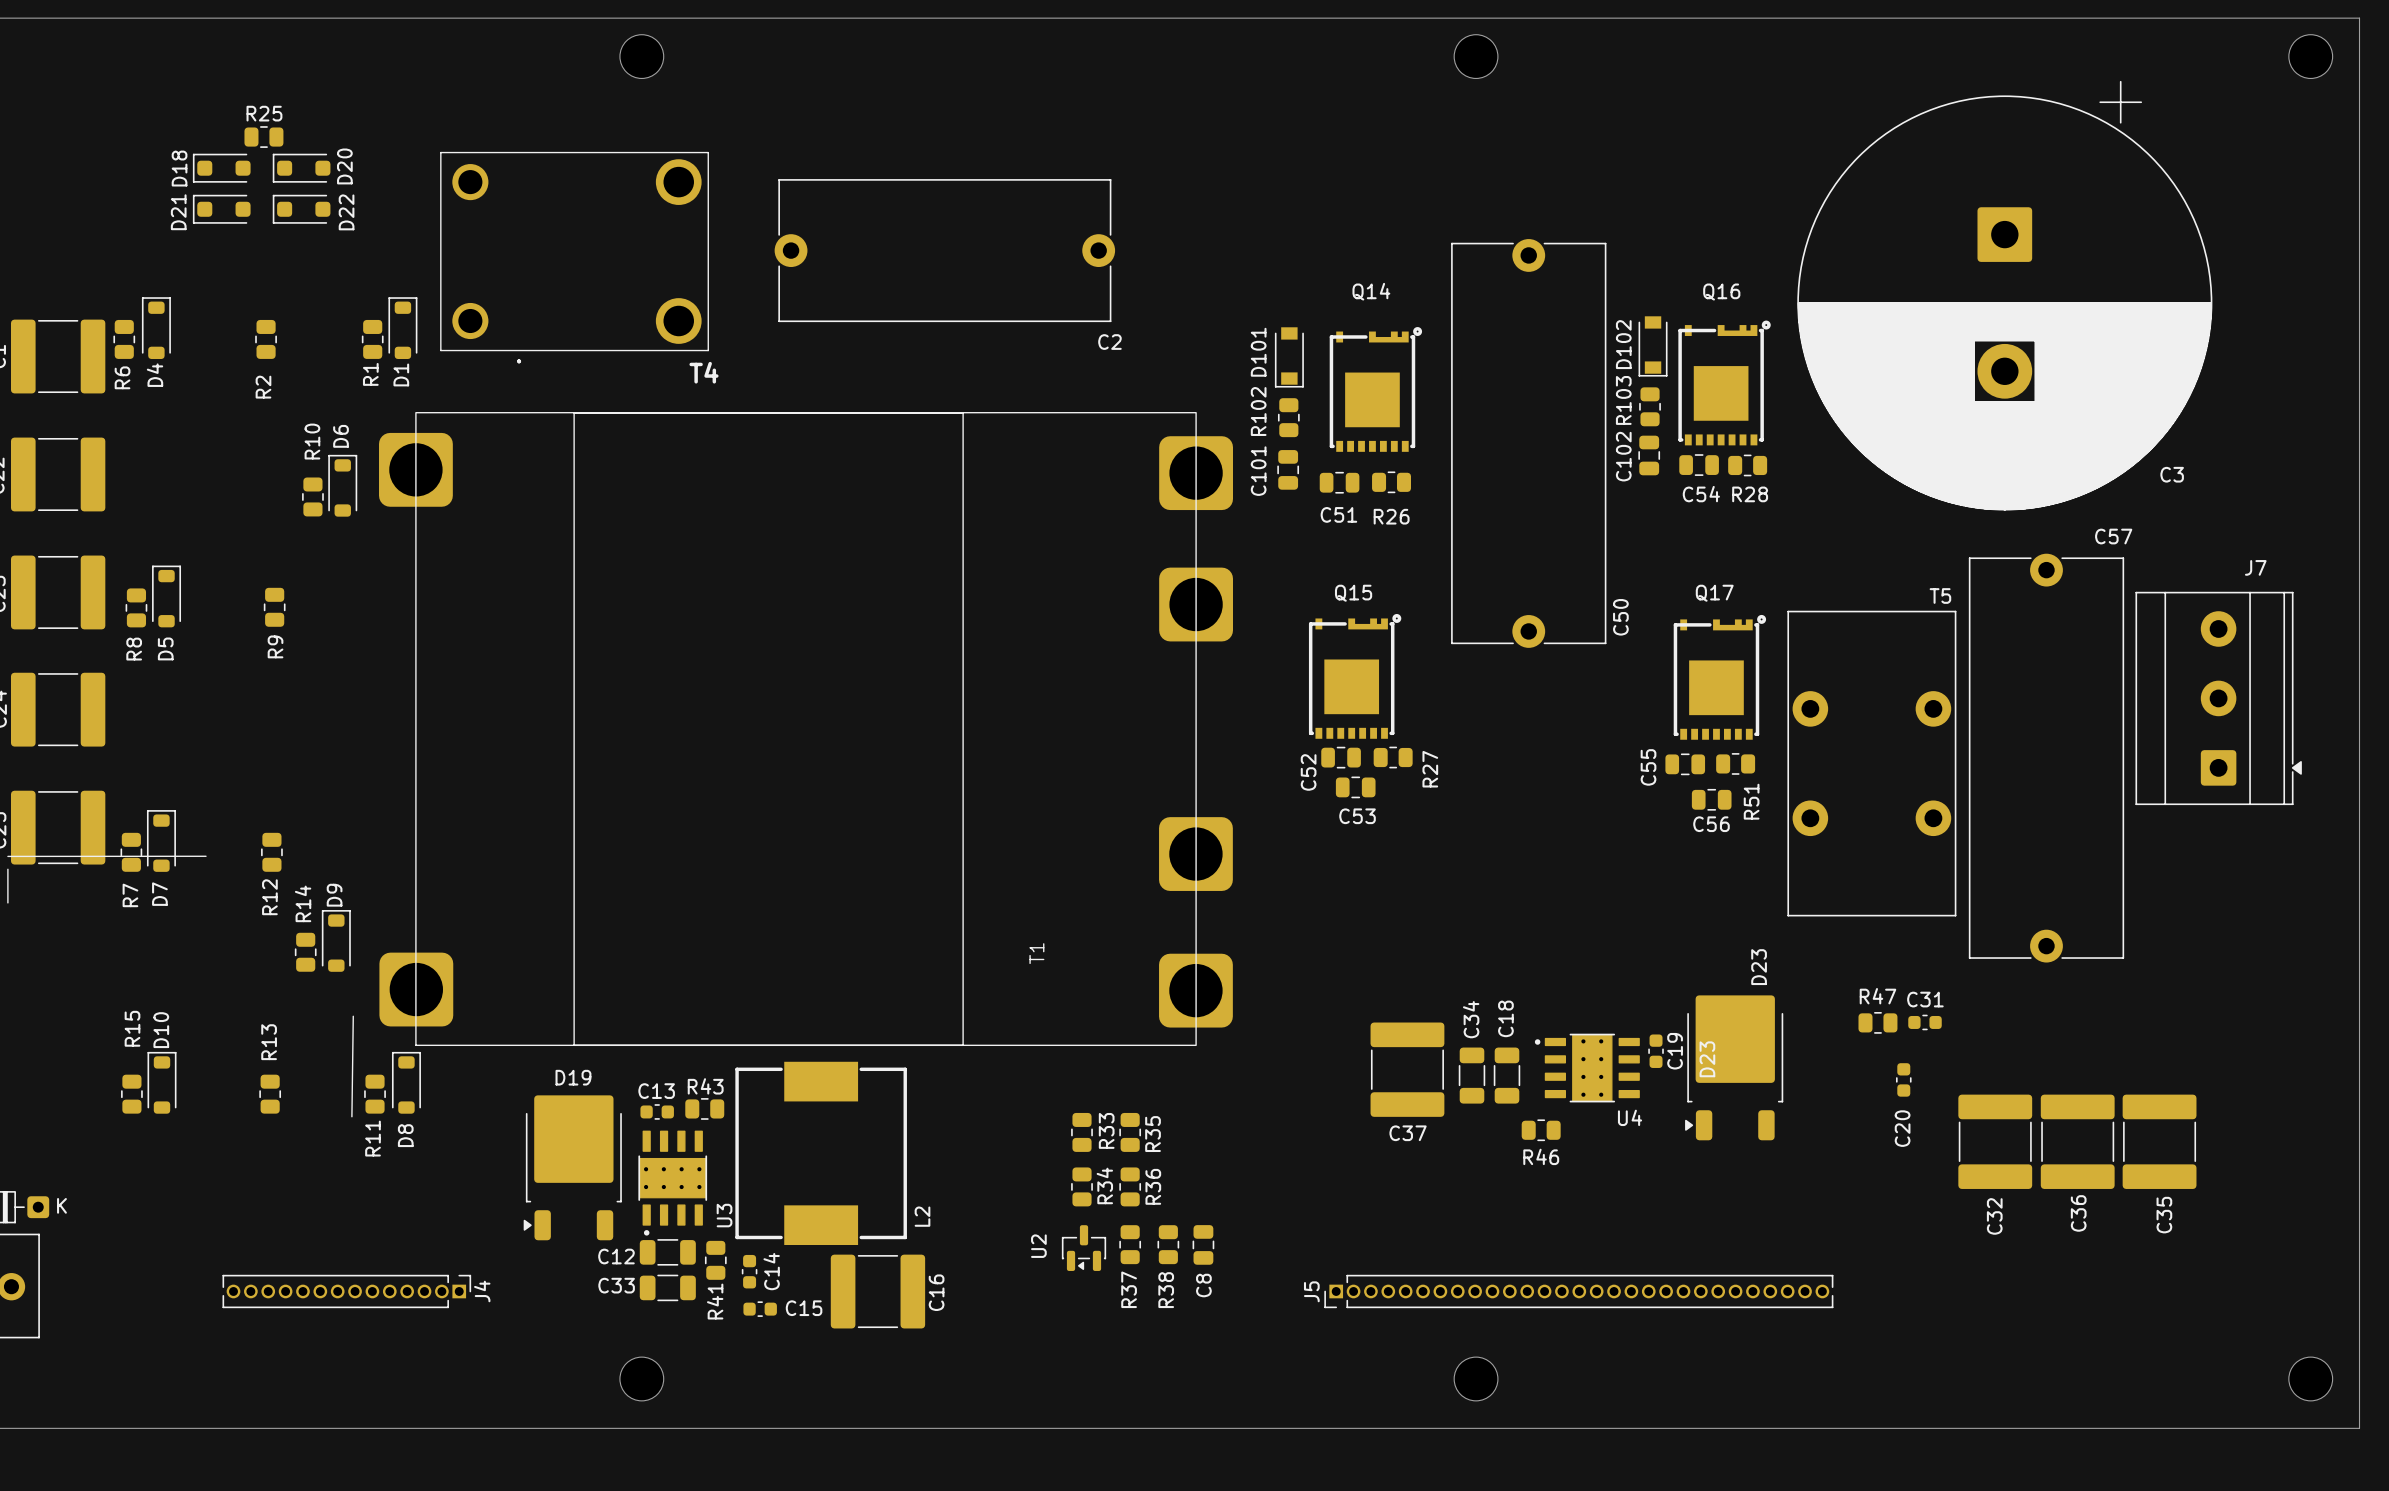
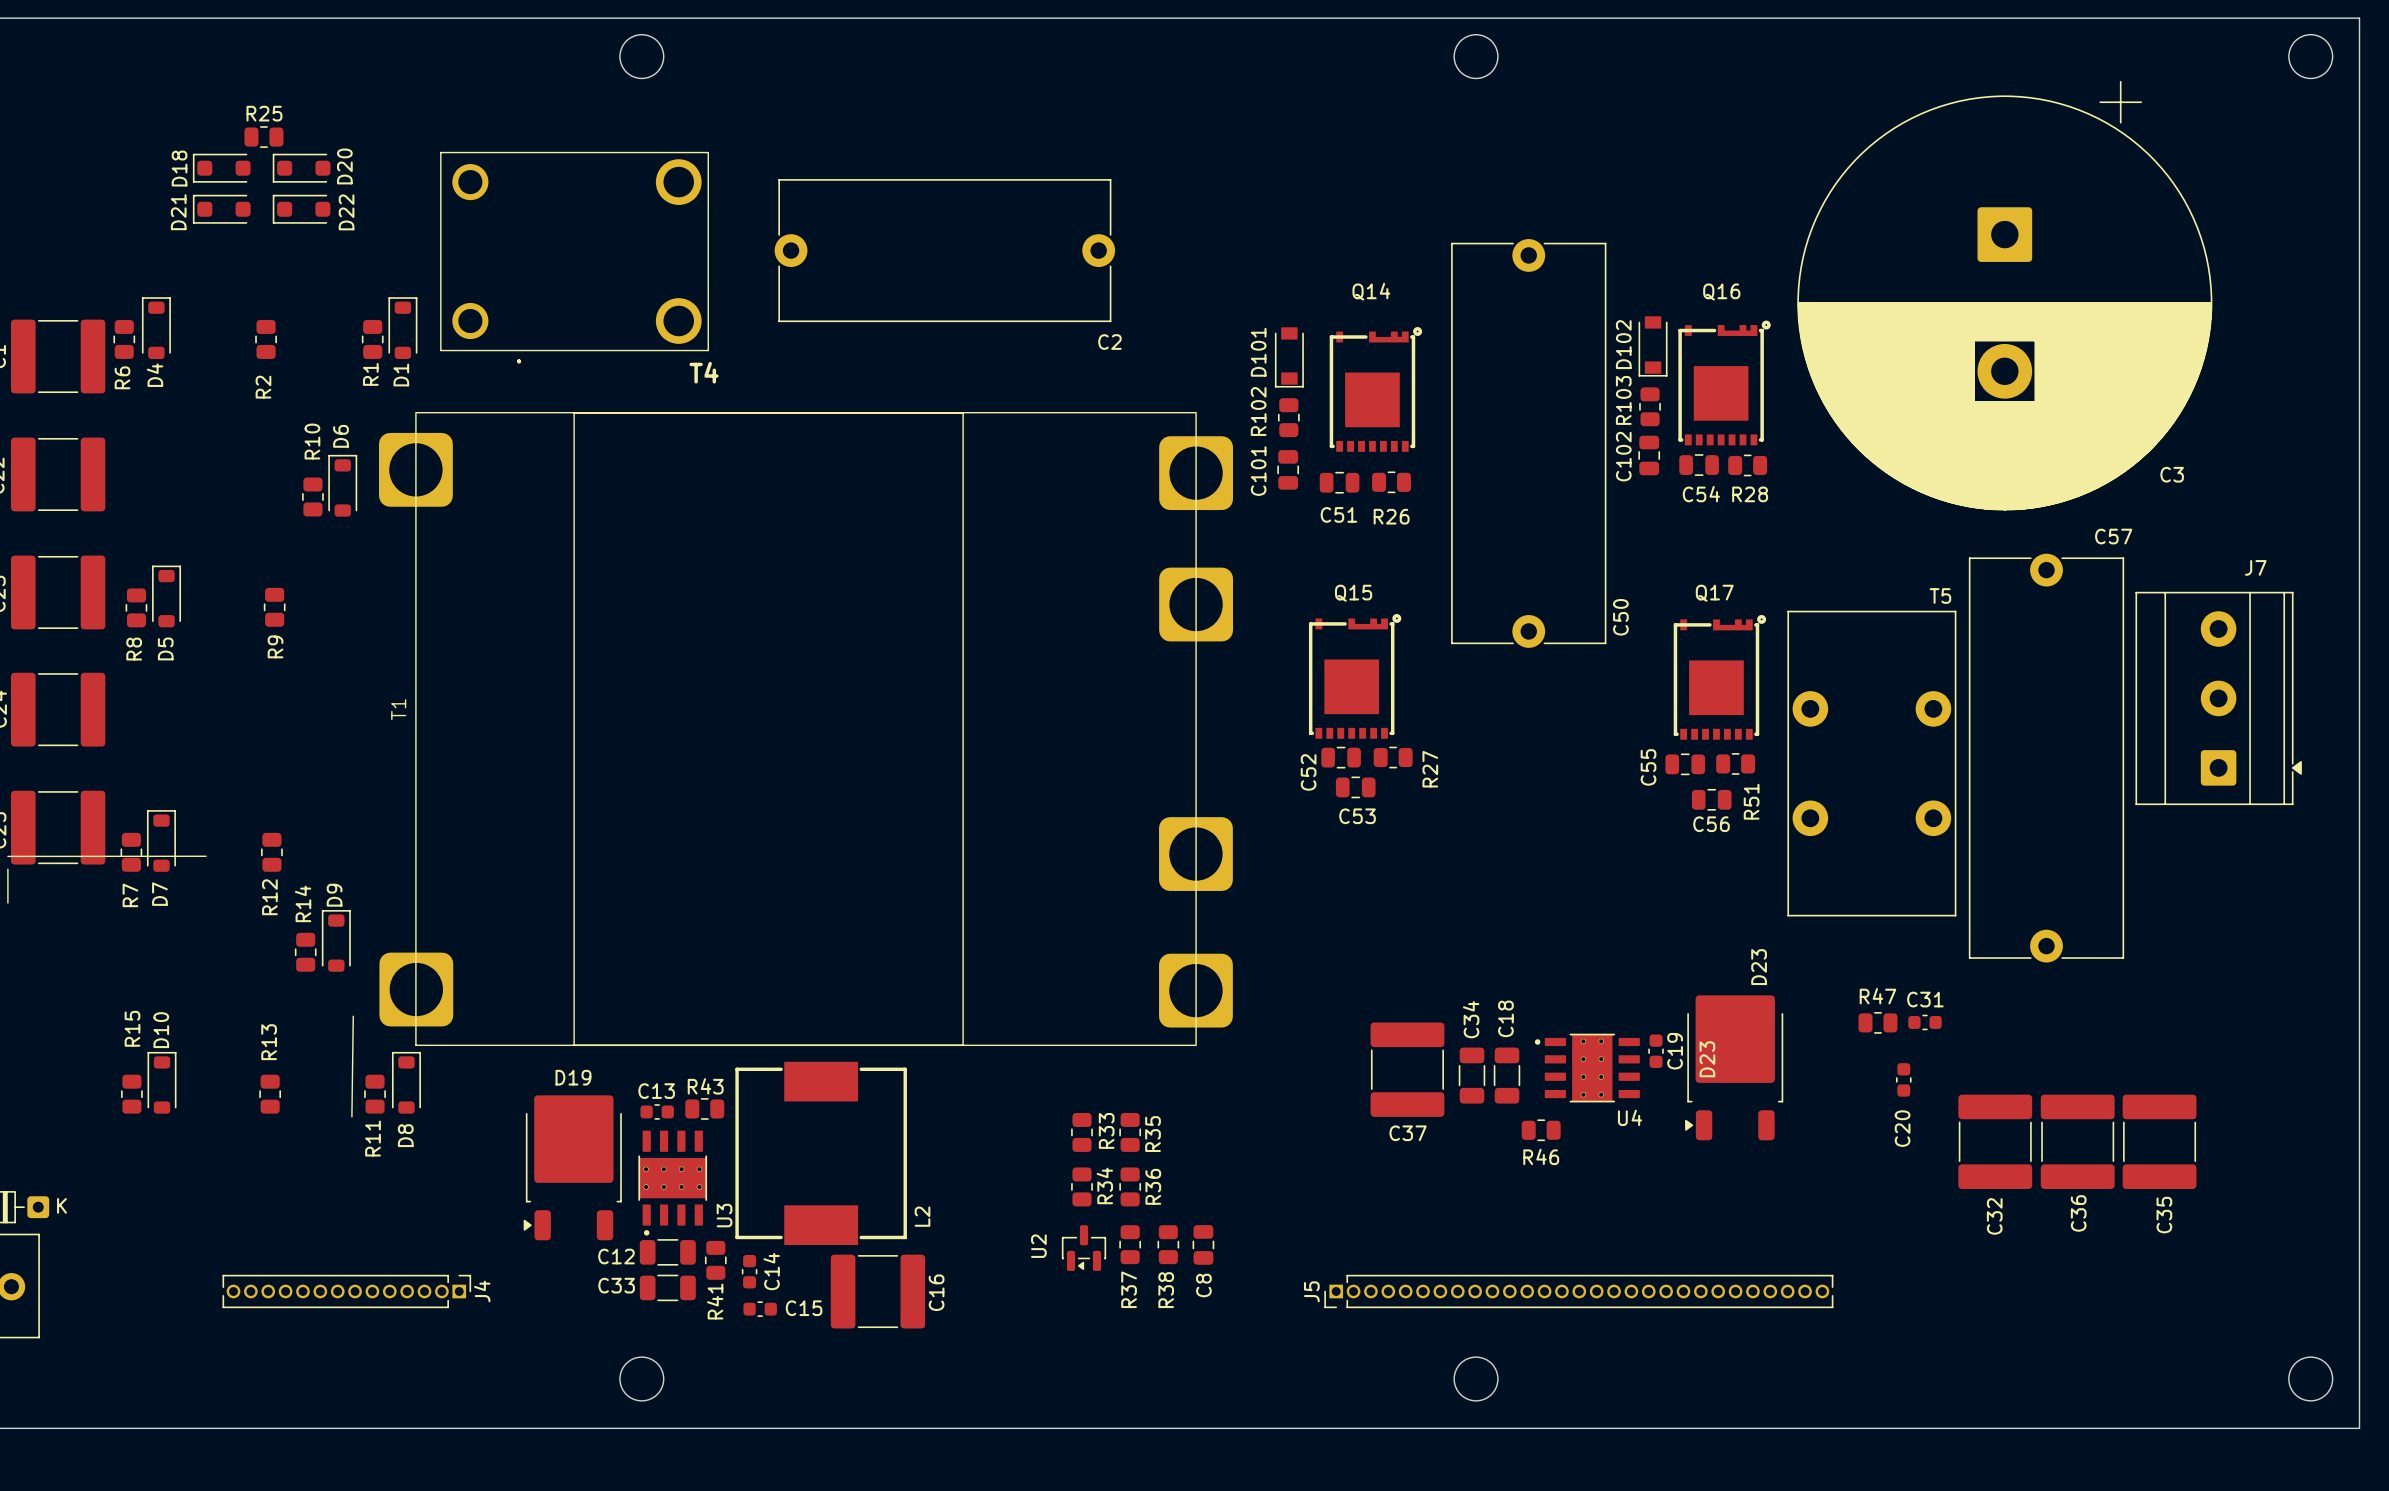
T1 name position: T1 (1036, 953) -> T1 (398, 709)

